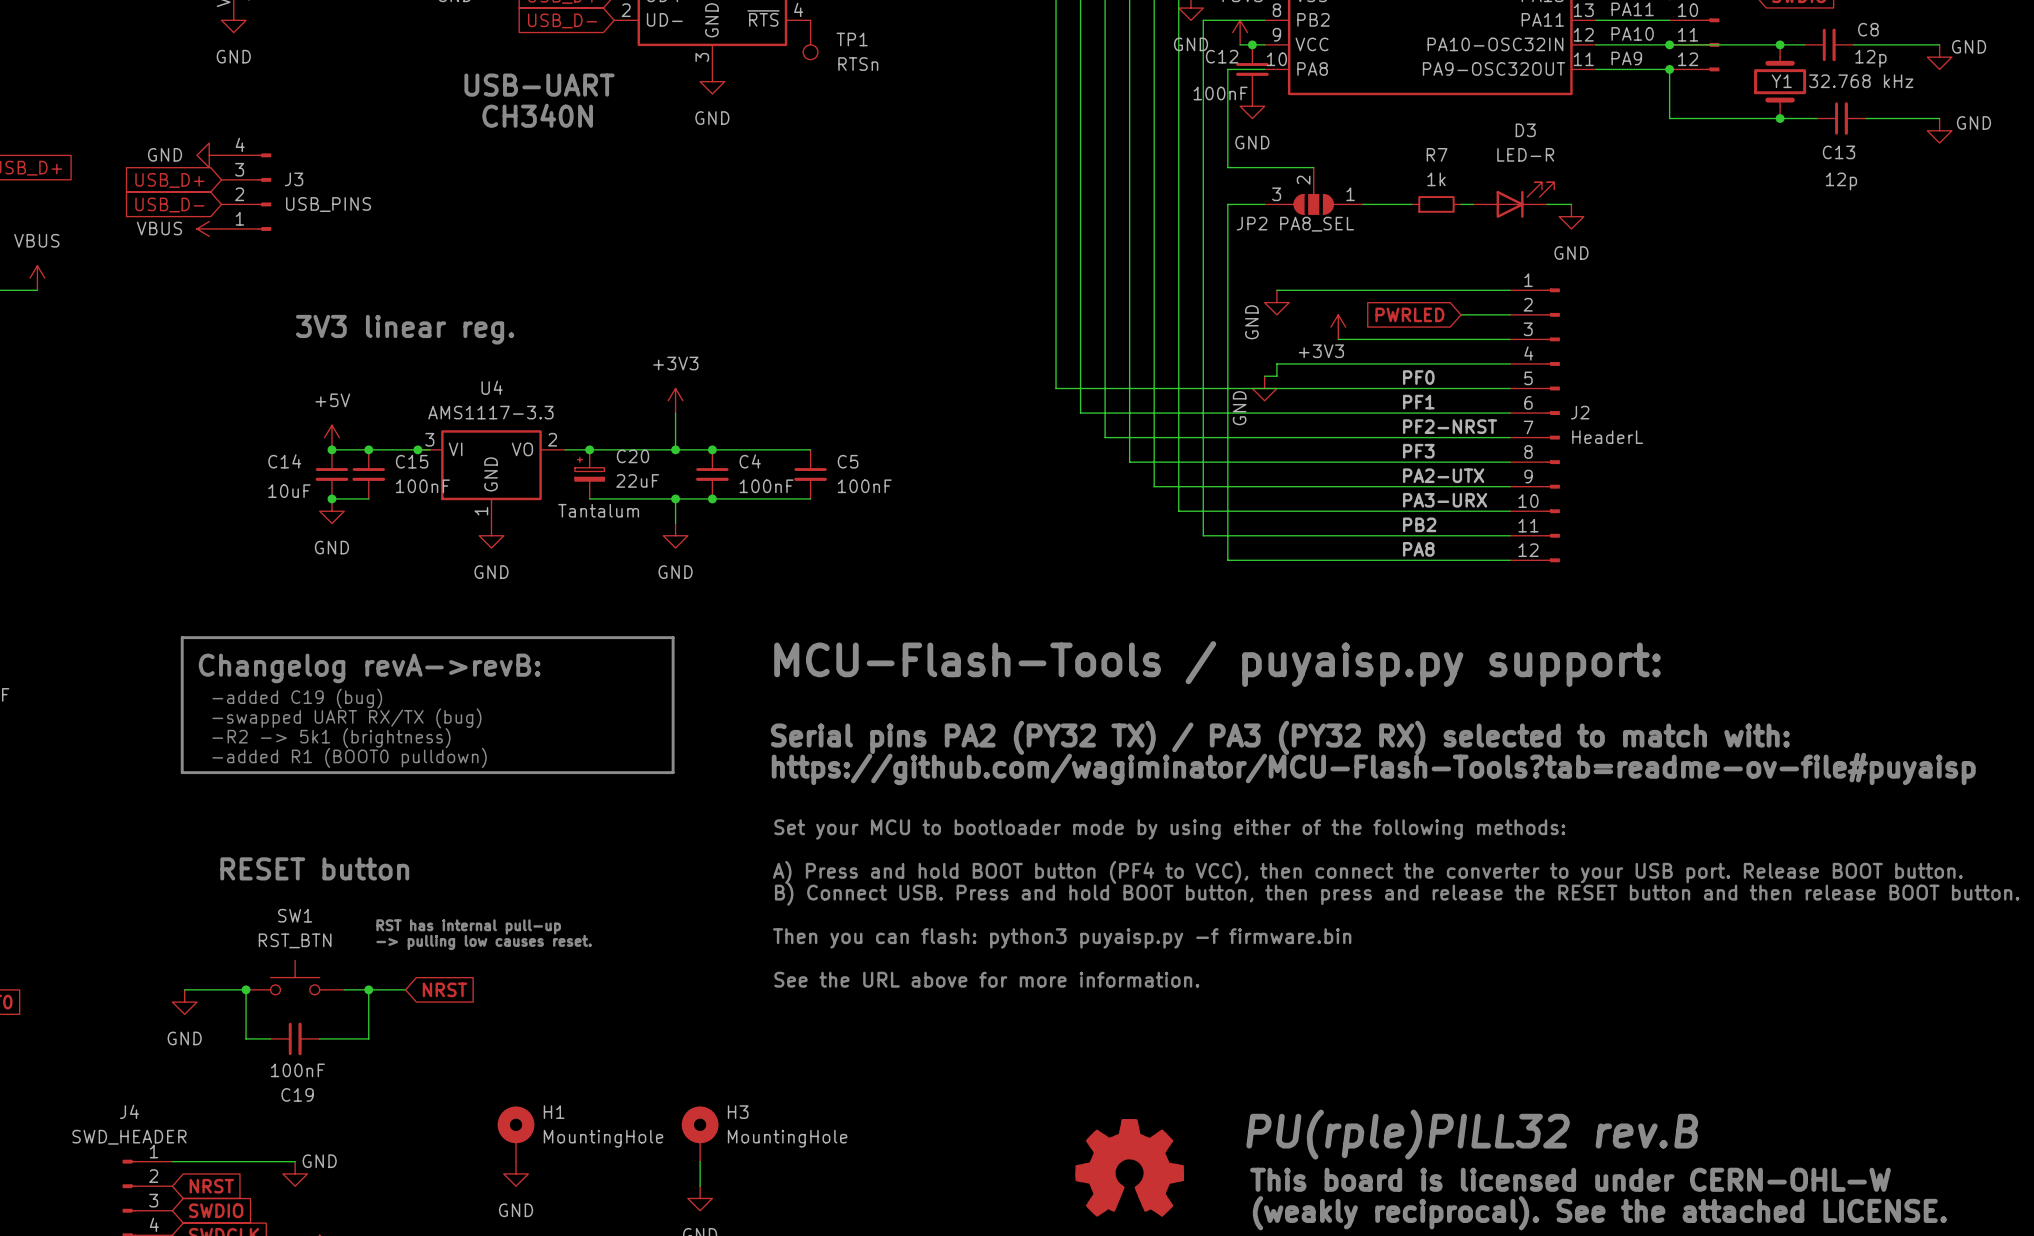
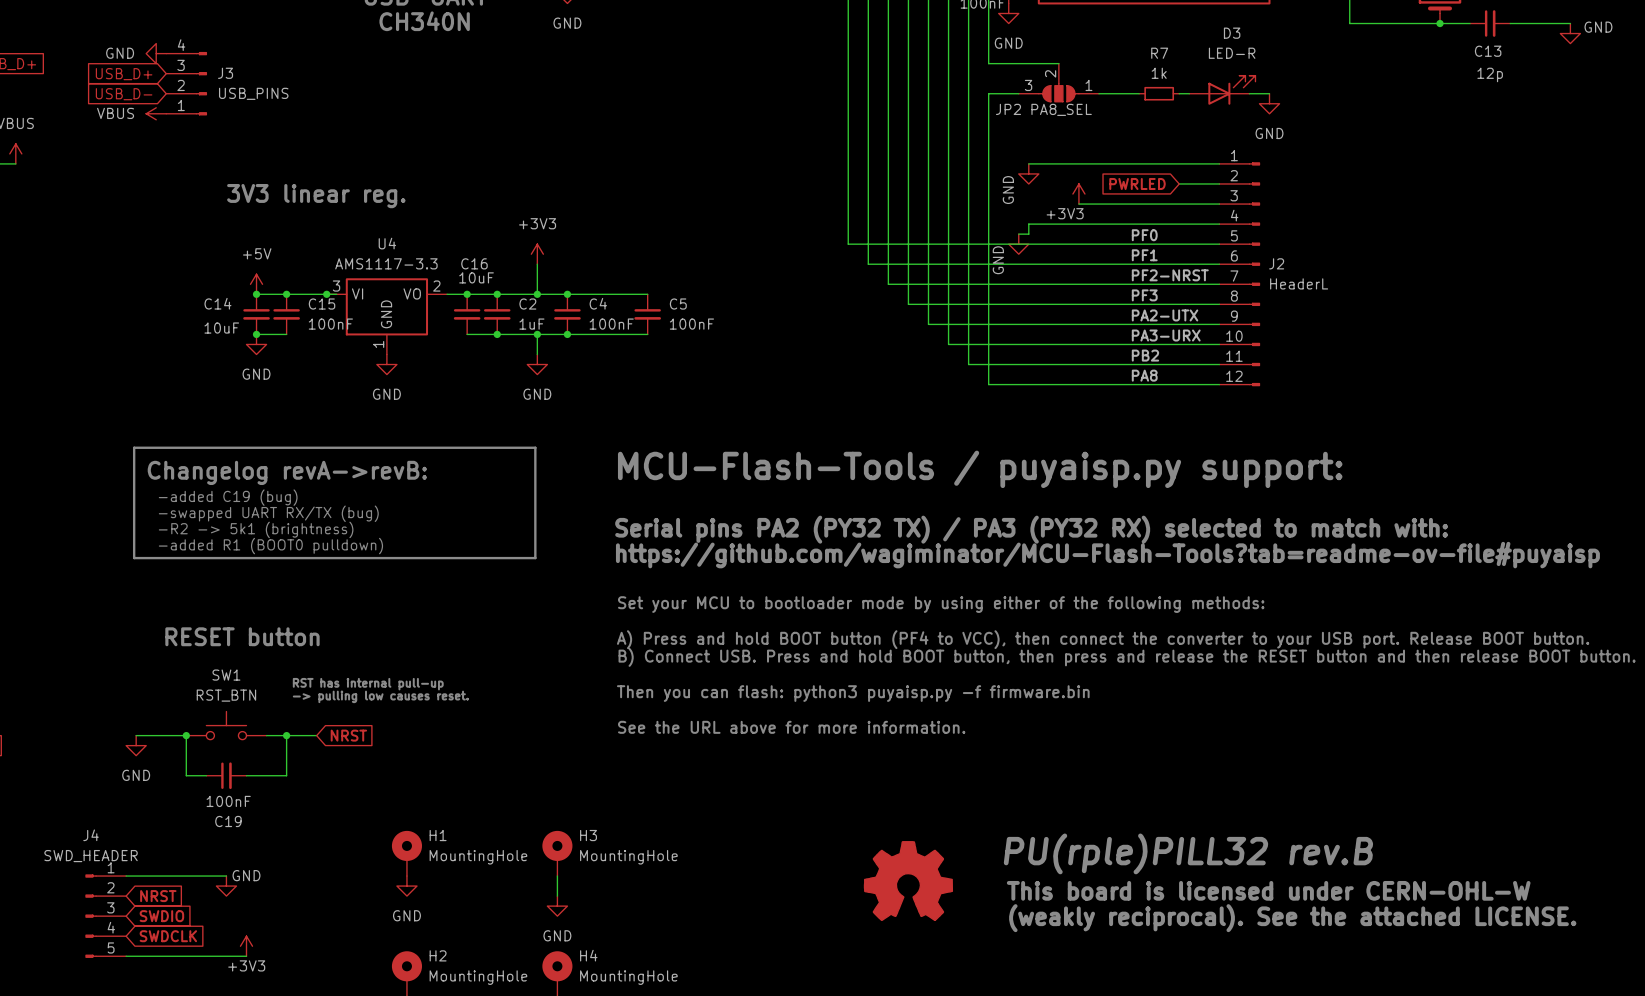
junction: none -> (497, 294)
C20: 22uF (589, 474) -> none
C16: none -> 10uF (467, 314)
C2: none -> 1uF (497, 314)
junction: none -> (497, 334)

